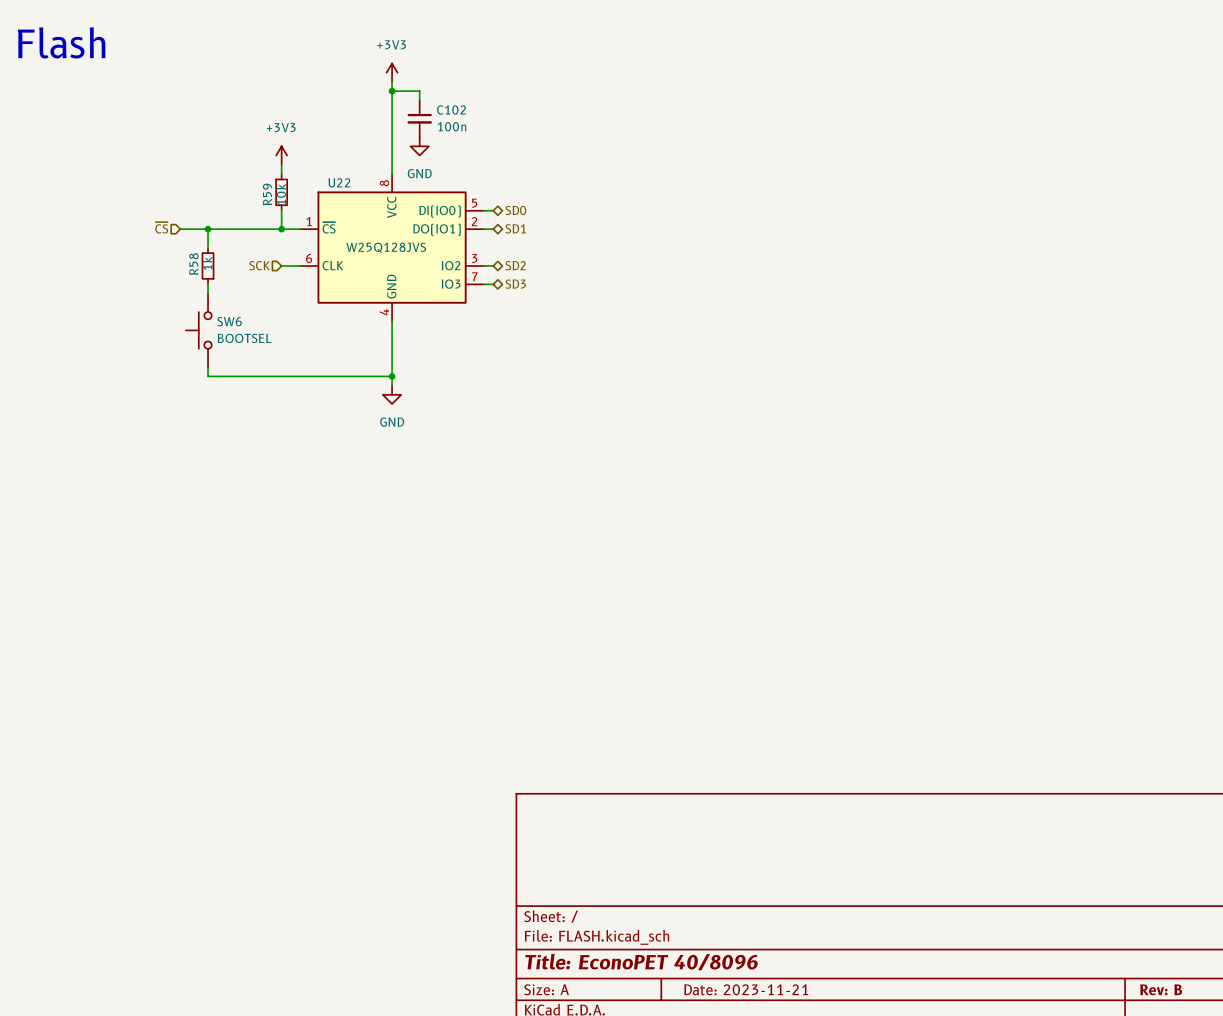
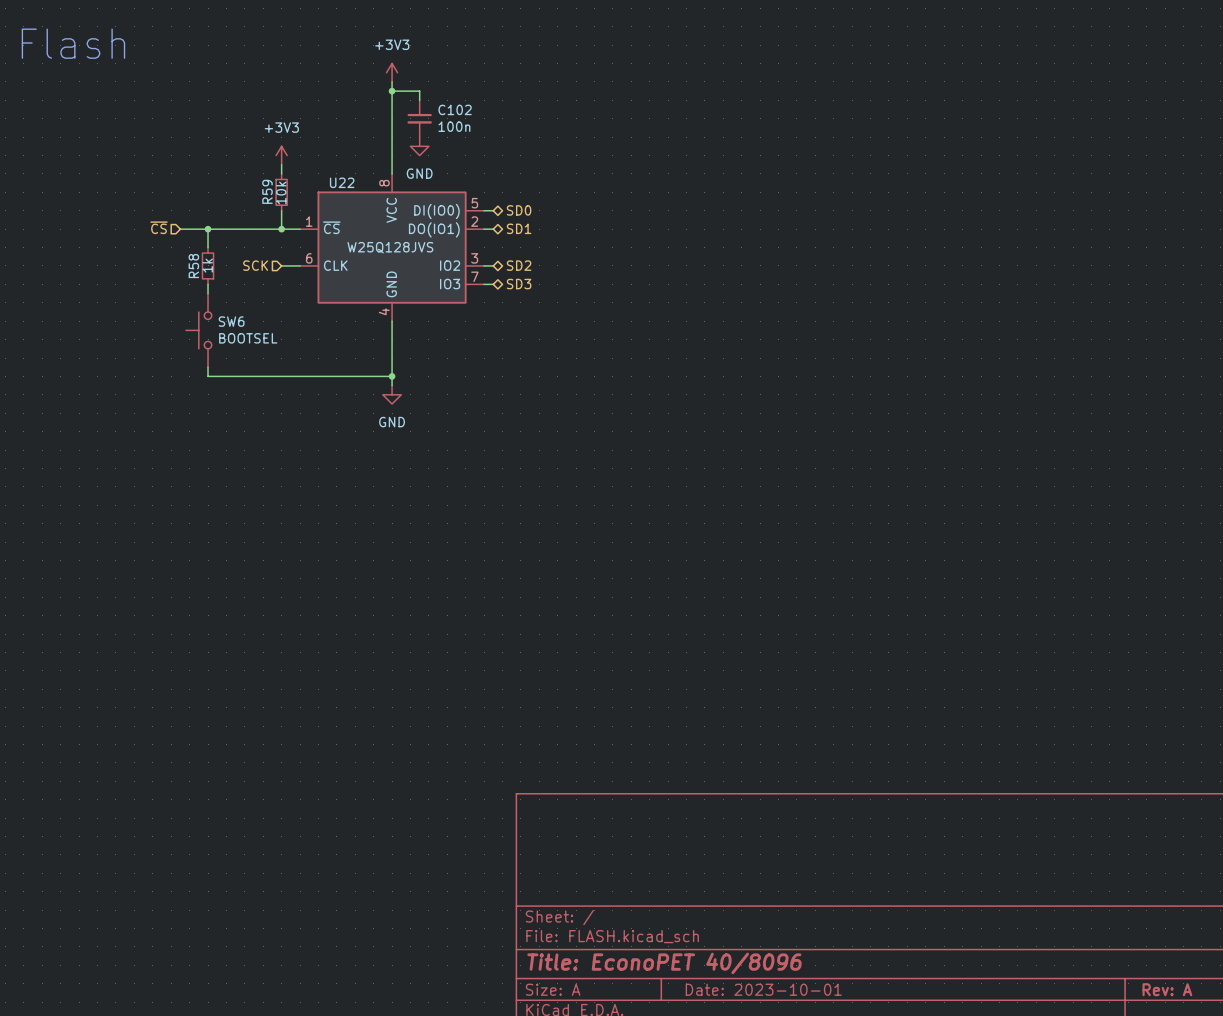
title block: Date: 2023-11-21 (746, 989) -> Date: 2023-10-01 (763, 989)
title block: Rev: B (1161, 989) -> Rev: A (1167, 989)

